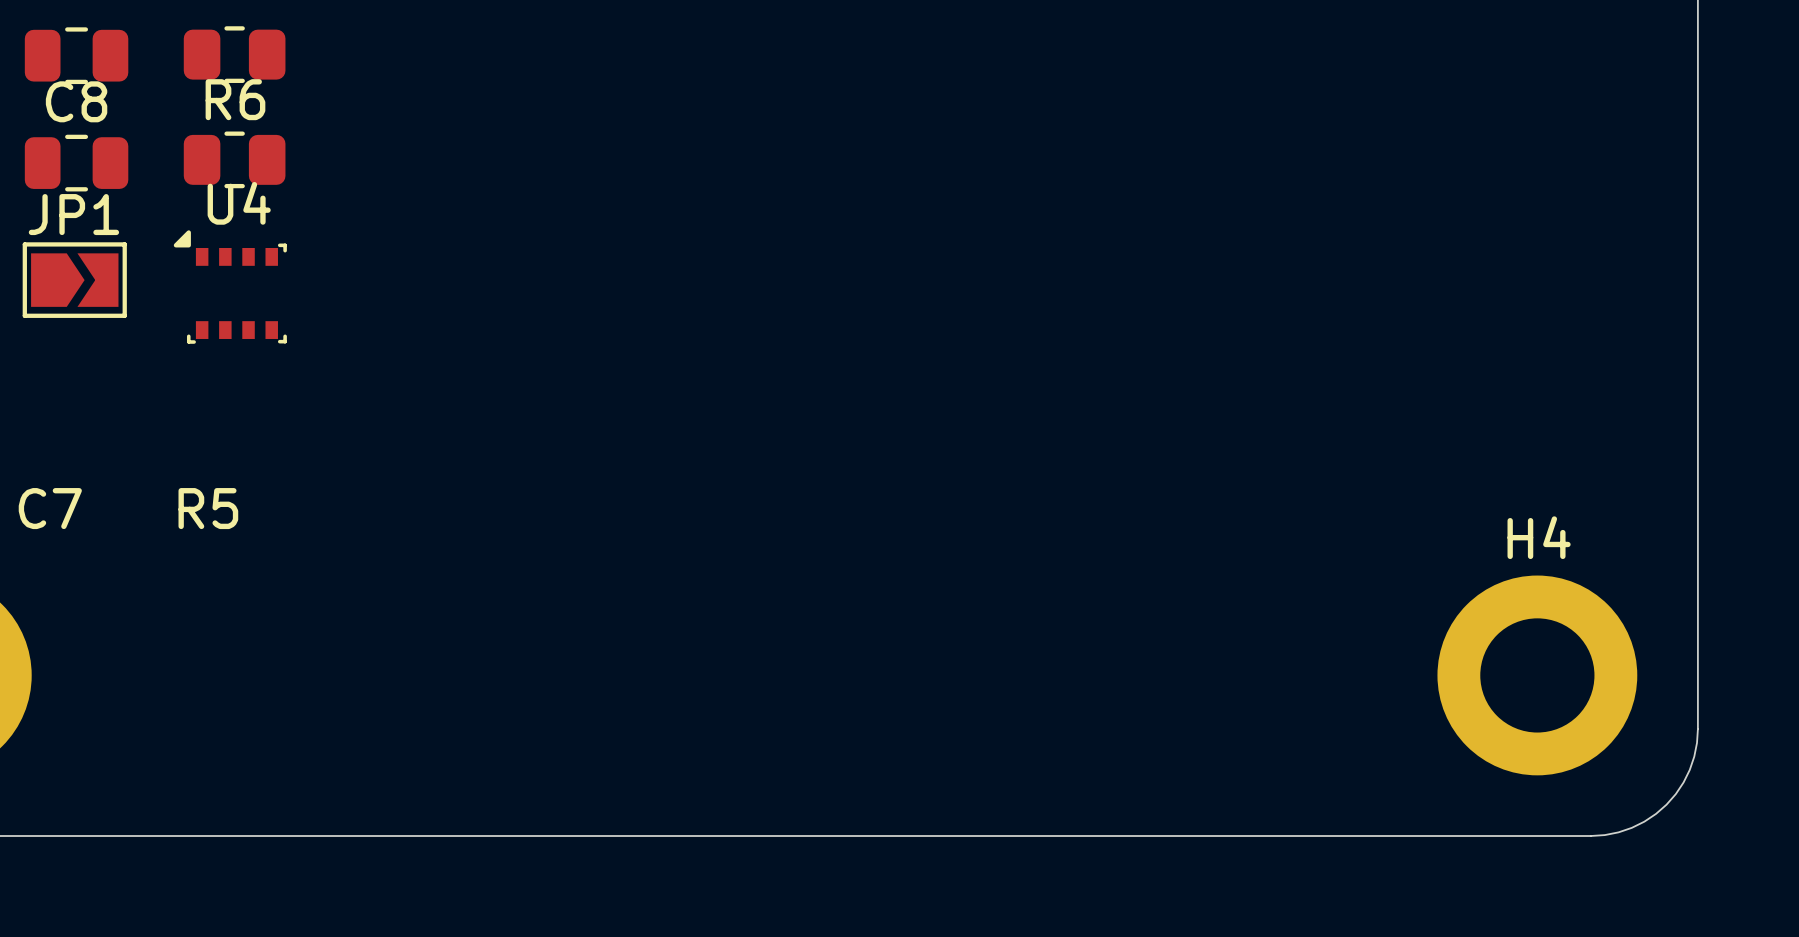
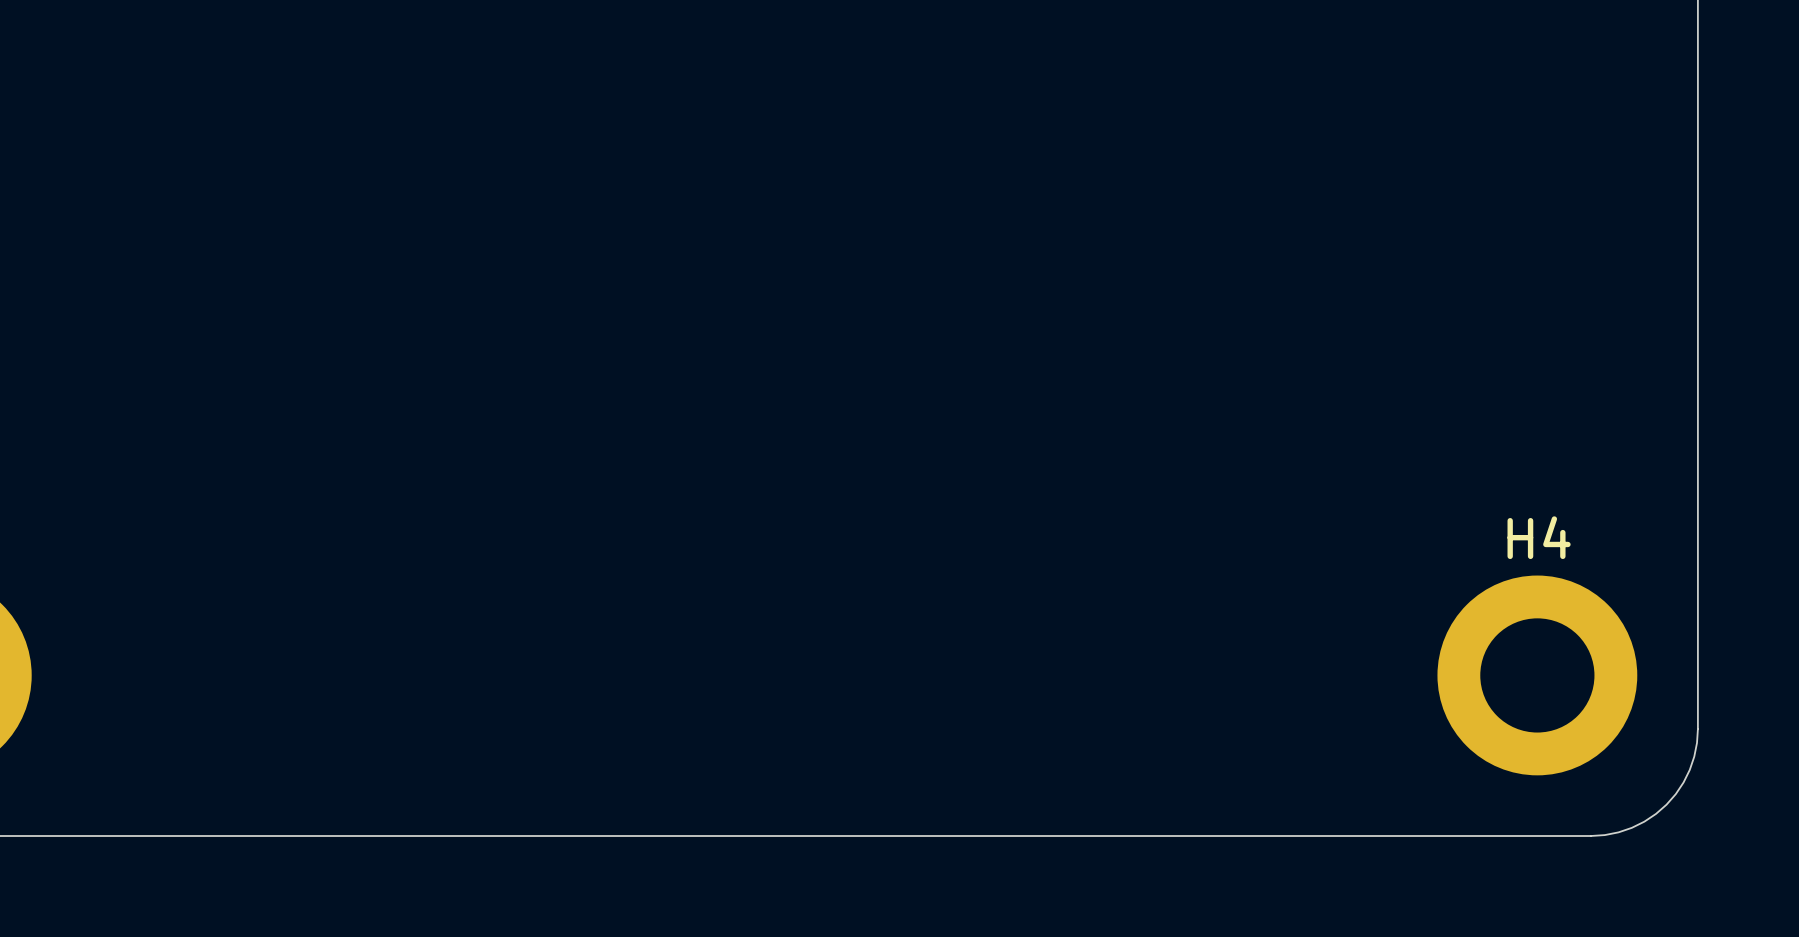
R5: (234, 54) -> none
C7: (76, 55) -> none
R6: (234, 159) -> none
C8: (76, 163) -> none
JP1: (74, 280) -> none
U4: (230, 287) -> none

